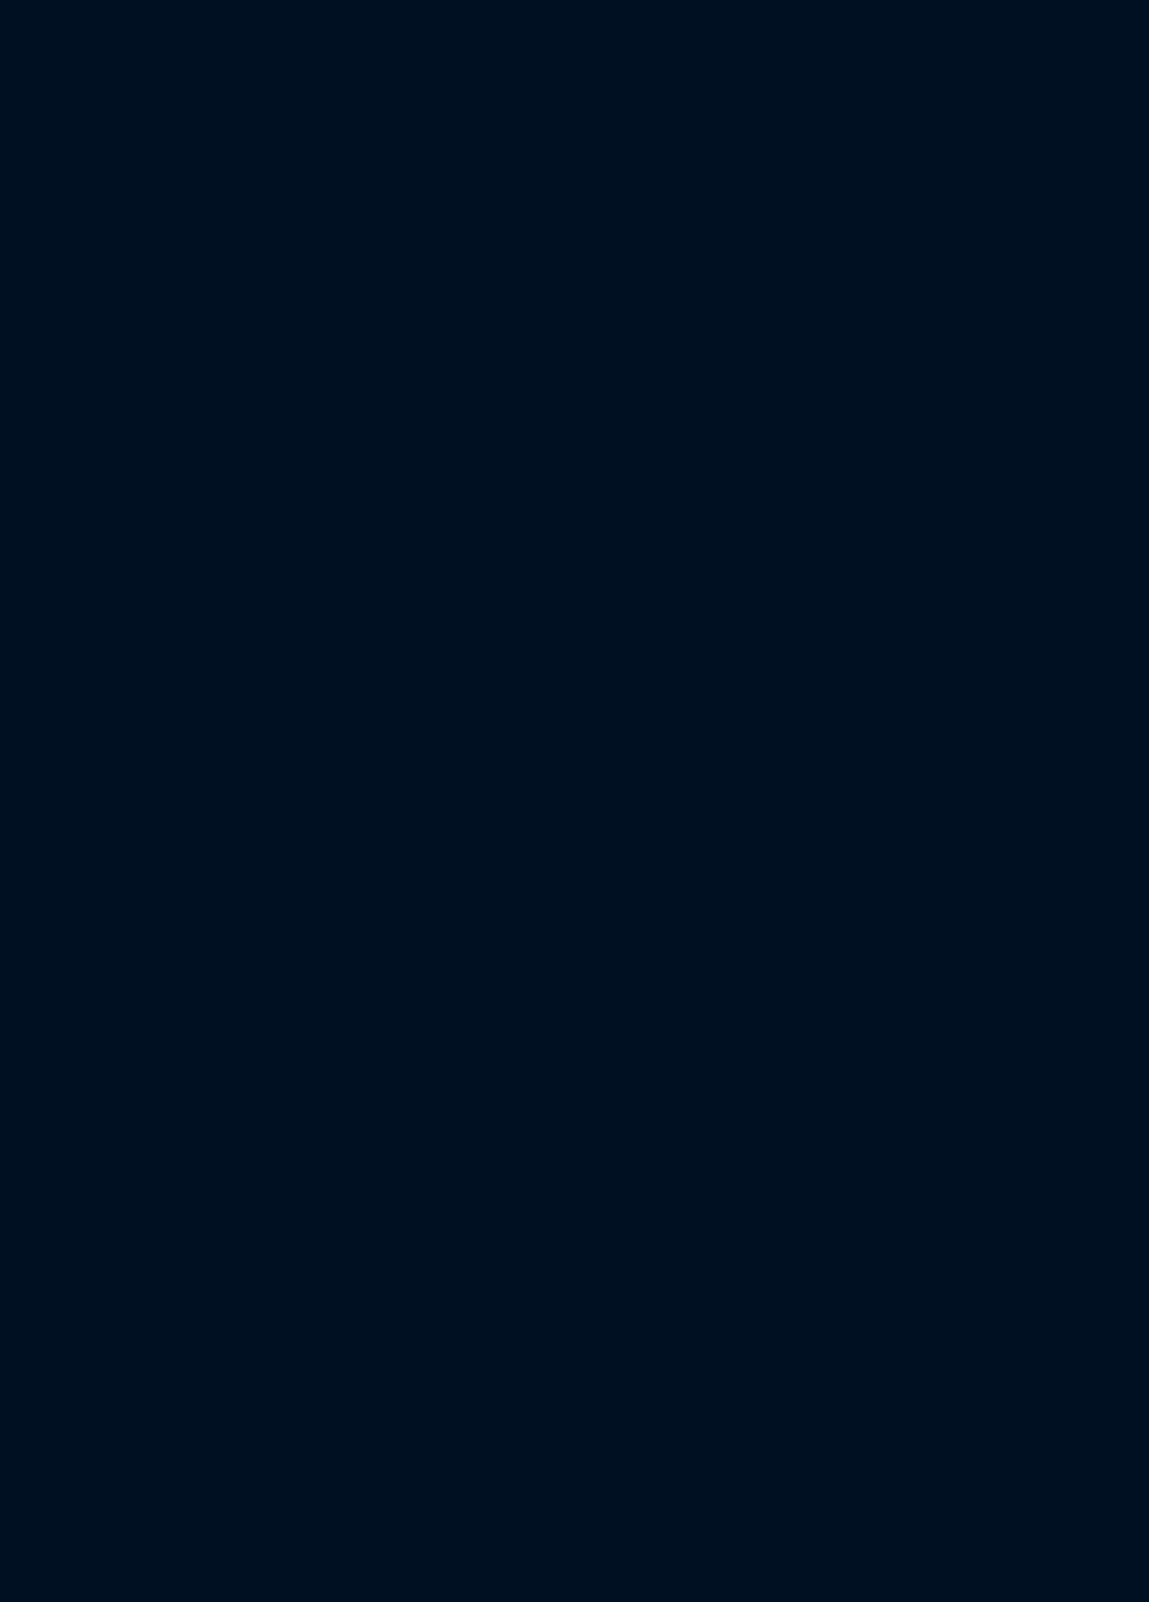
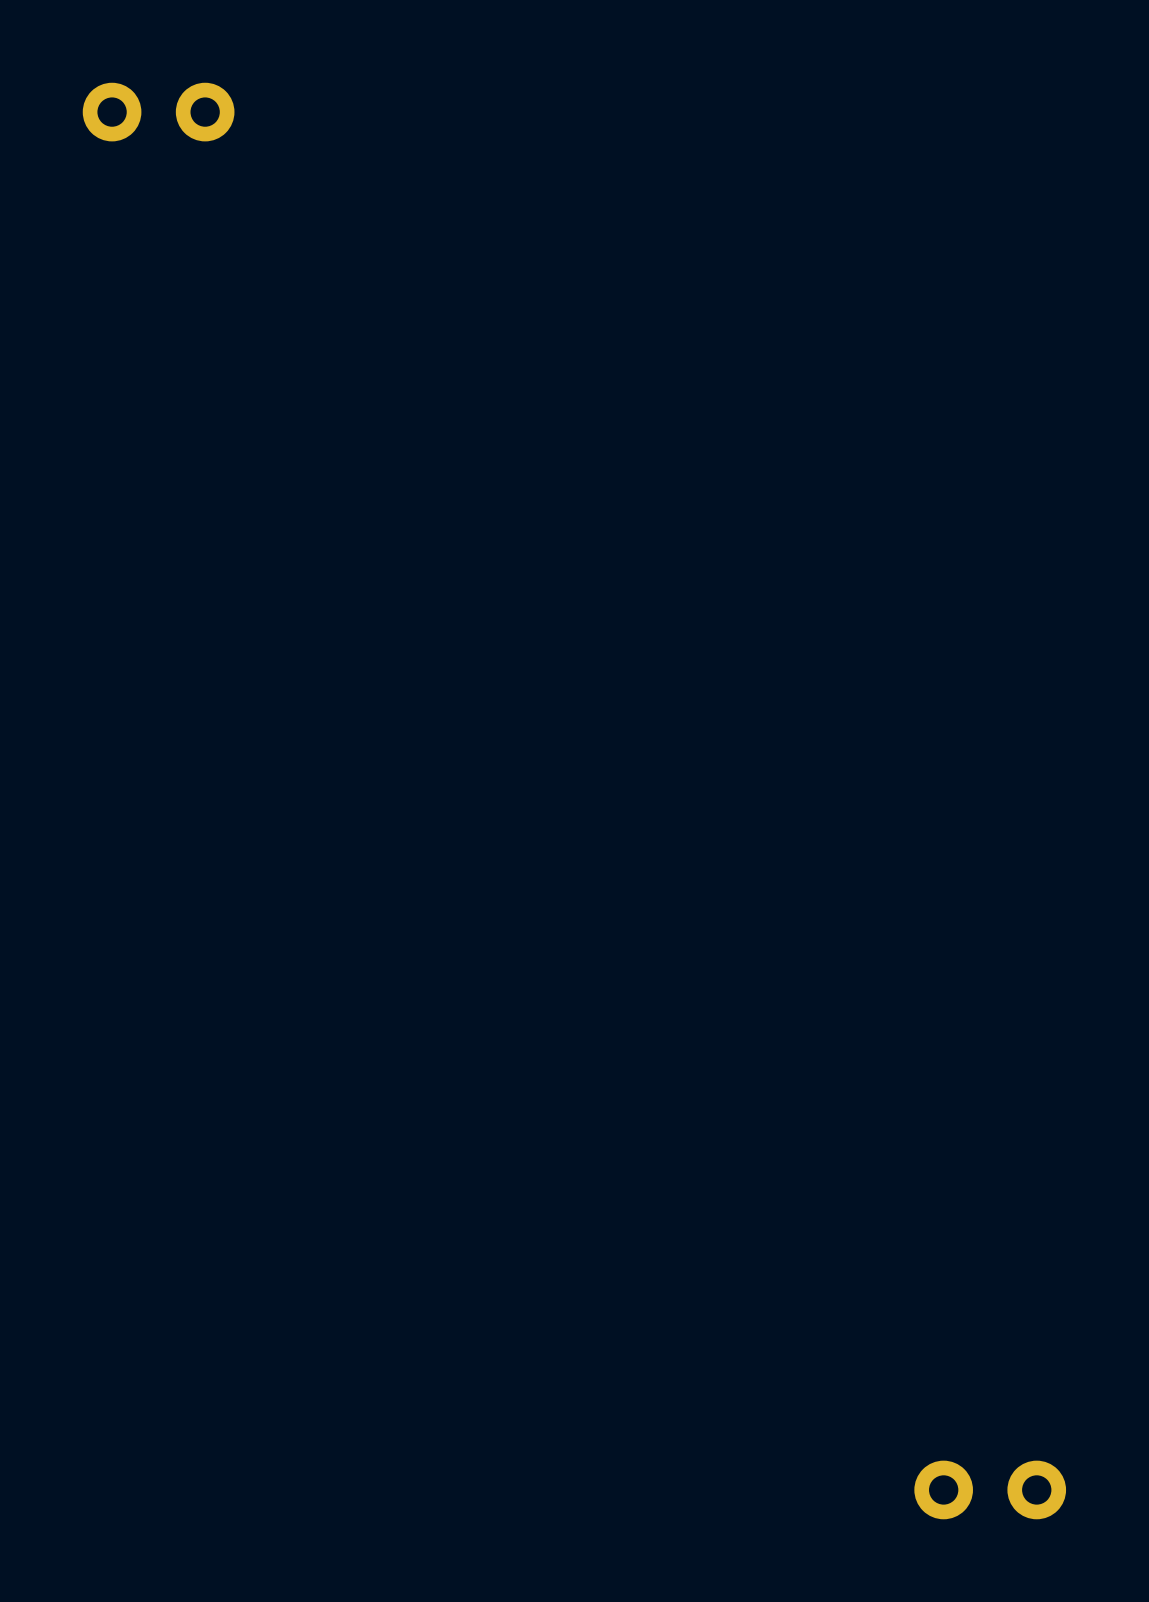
part: none -> (158, 112)
part: none -> (990, 1489)

